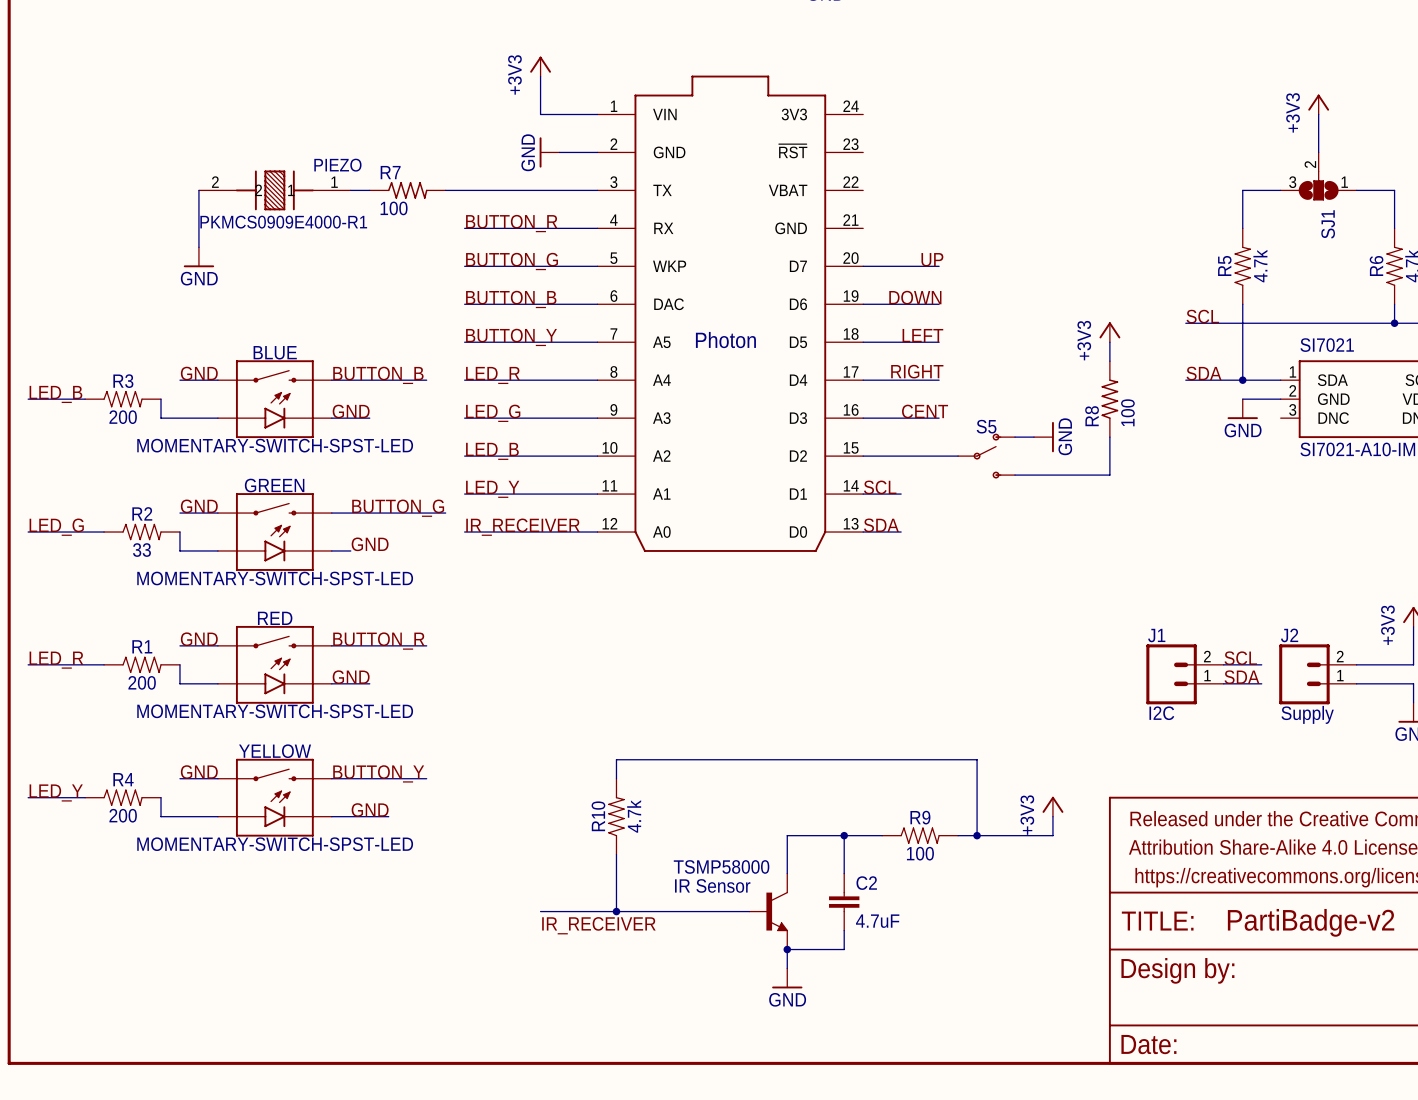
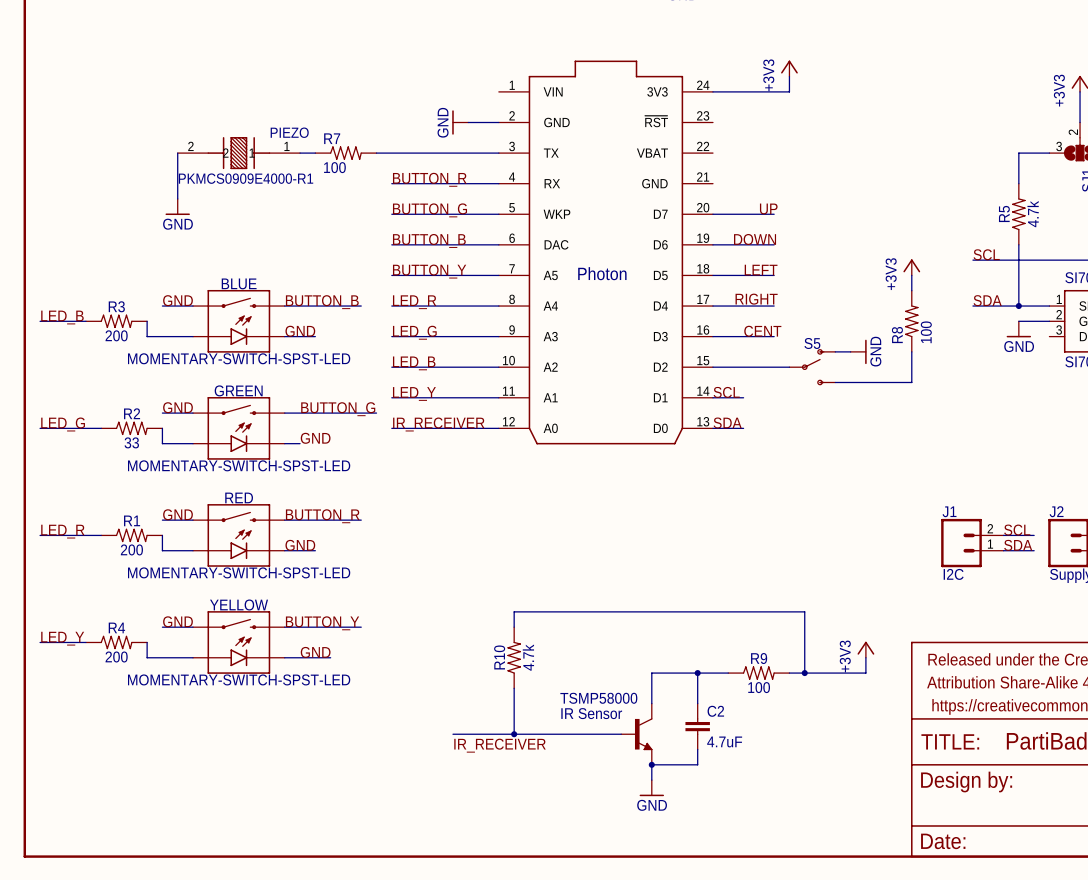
power symbol: +3V3 (540, 66) -> none
wire: (540, 76) (540, 114) (597, 114) -> none
power symbol: none -> +3V3 (789, 68)
wire: none -> (789, 76) (789, 91) (712, 91)

